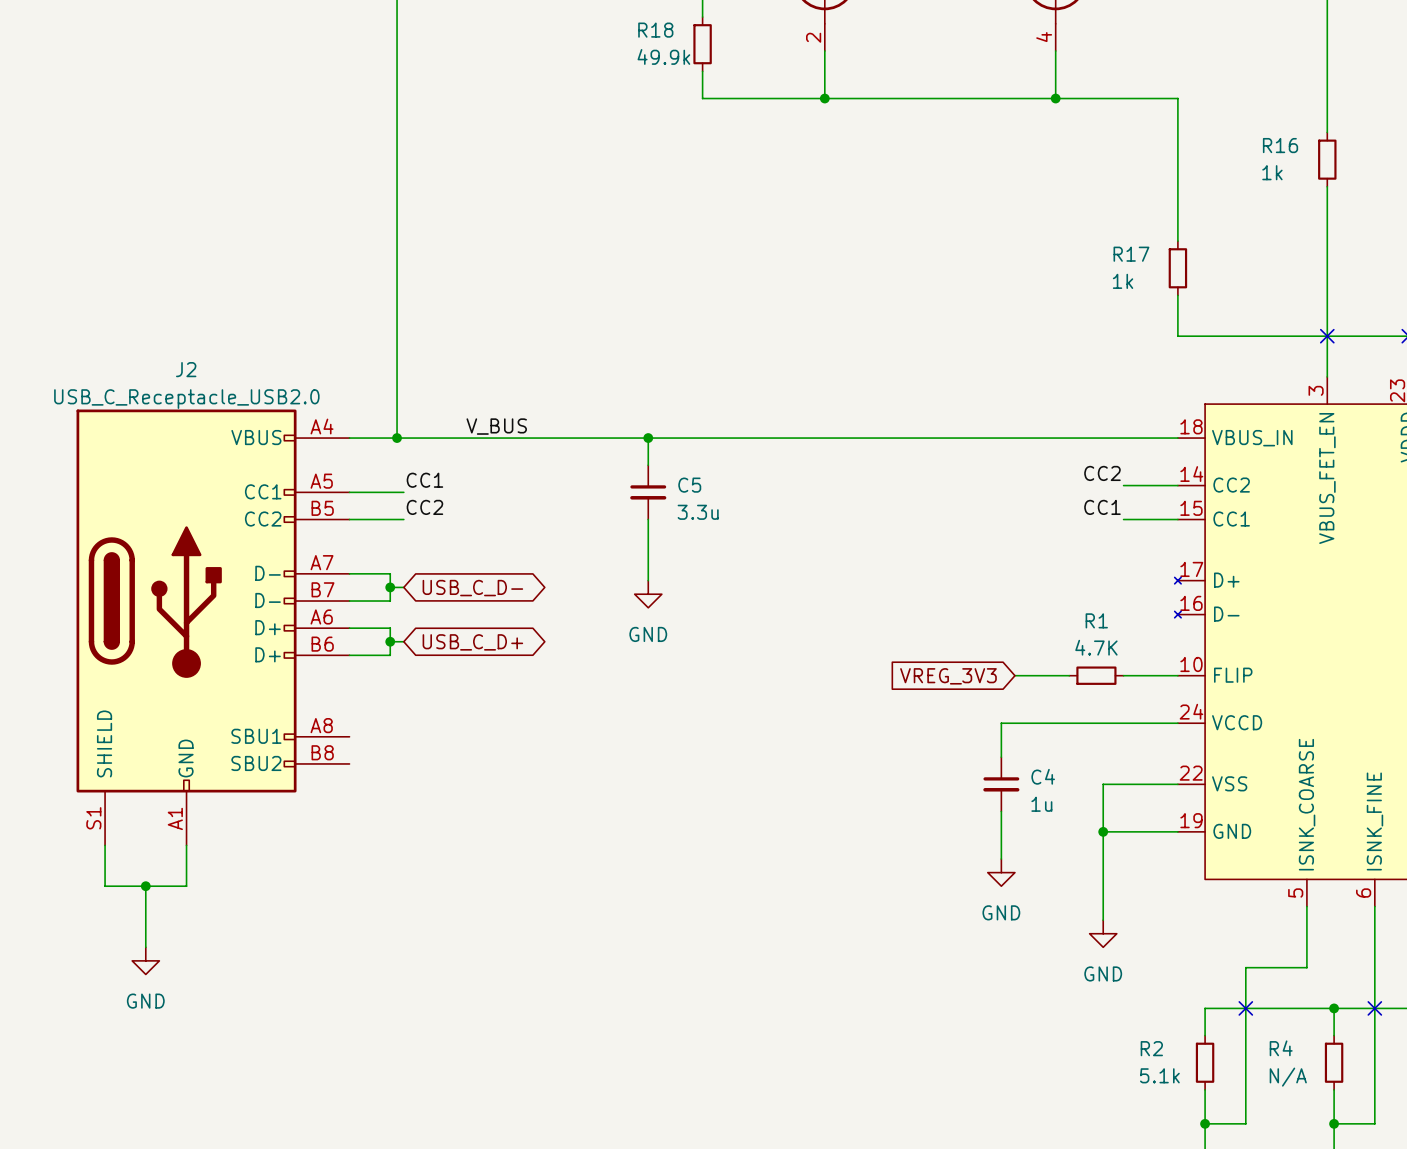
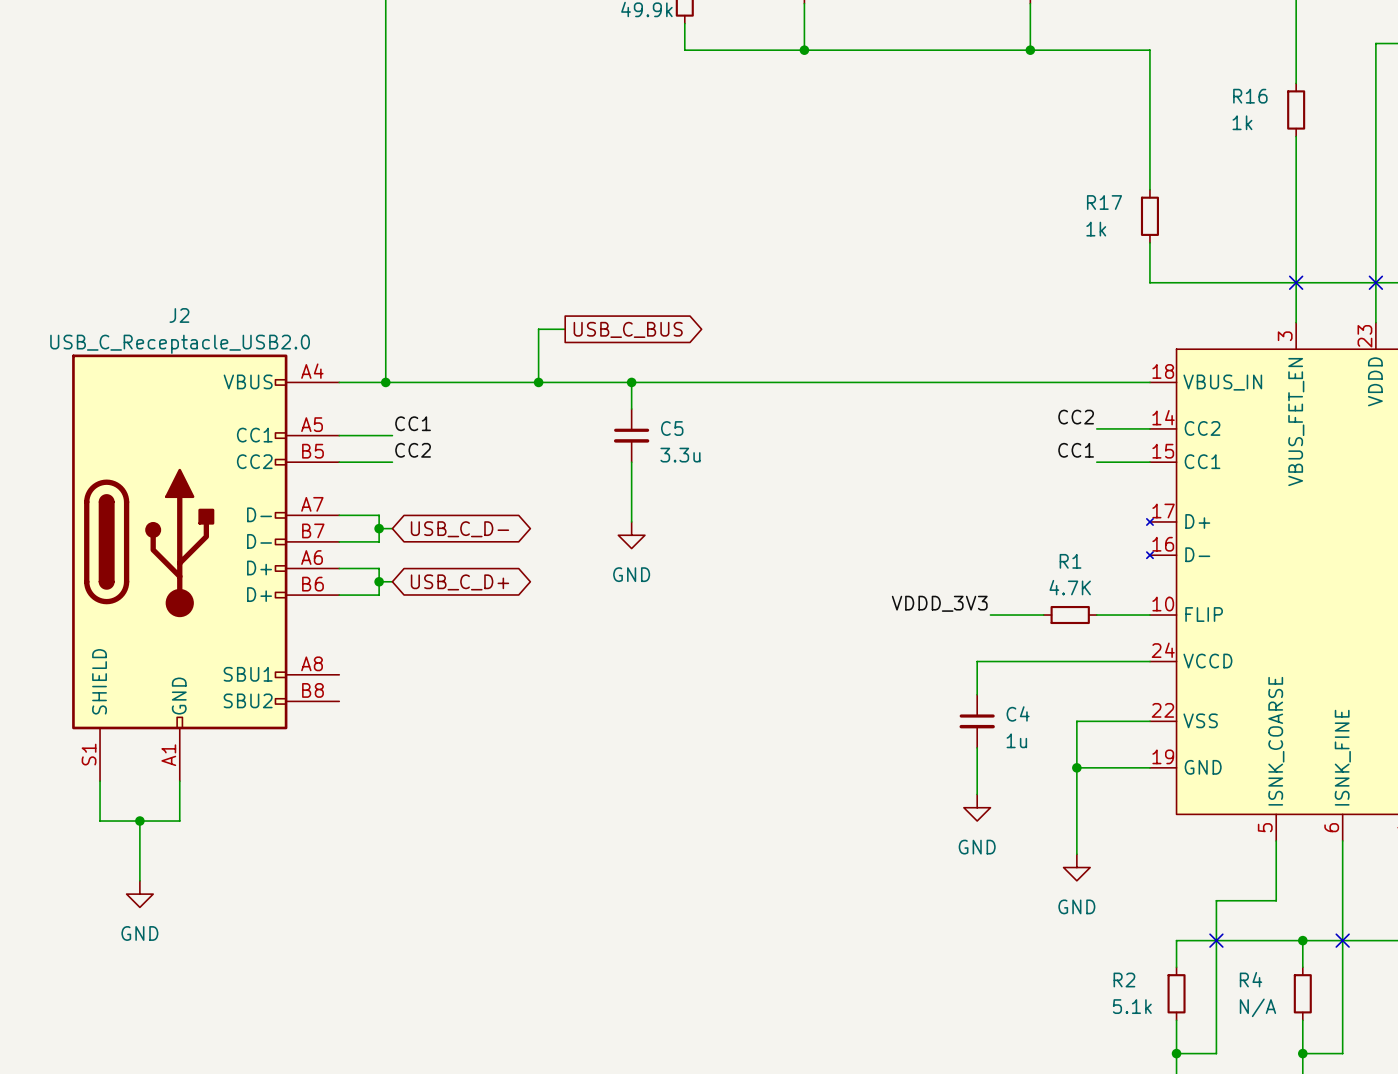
wire: none -> (565, 329) (538, 329) (538, 382)
global label: none -> USB_C_BUS (628, 329)
label: V_BUS (496, 426) -> none
junction: none -> (538, 382)
label: none -> VDDD_3V3 (939, 603)
global label: VREG_3V3 (948, 676) -> none

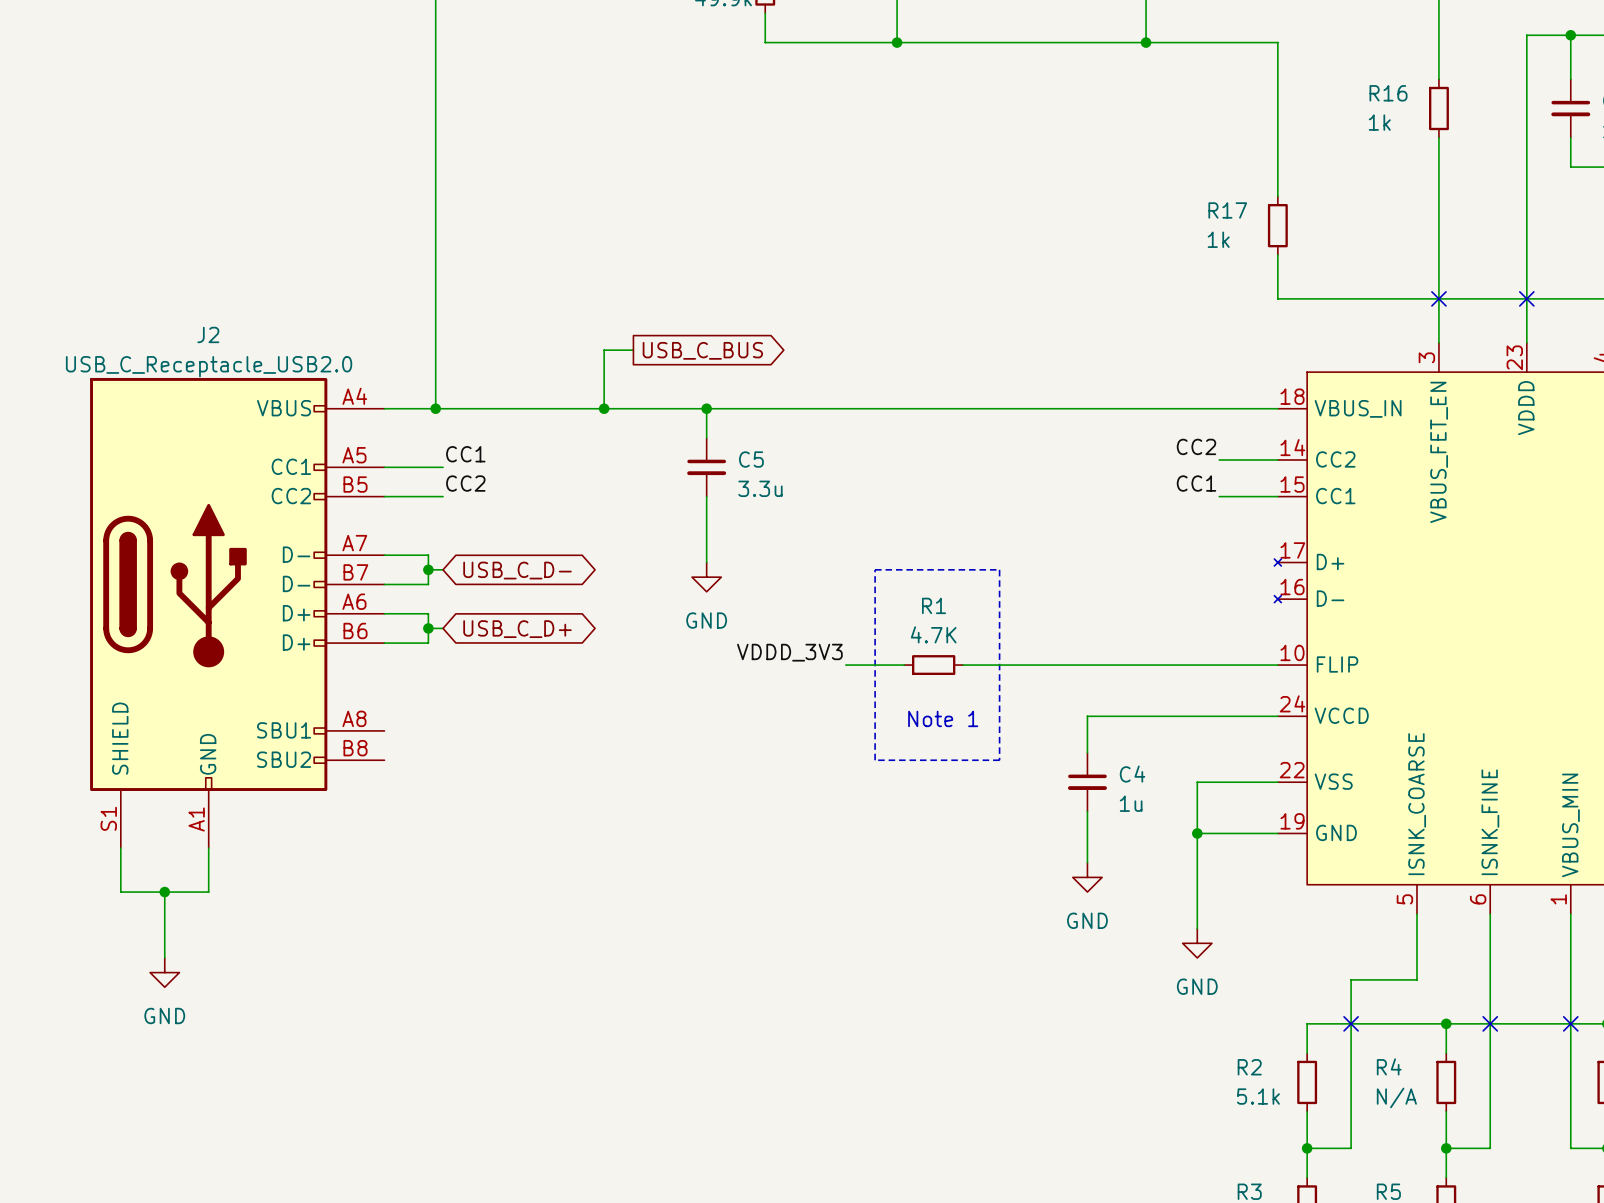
line: none -> (875, 569) (999, 569) (999, 760) (875, 760) (875, 569)
label position: VDDD_3V3 (939, 603) -> VDDD_3V3 (789, 652)
wire: none -> (845, 665) (904, 665)
wire: none -> (962, 665) (1102, 665)
wire: none -> (1160, 665) (1219, 665)
R1 position: (1070, 615) -> (933, 665)
text: none -> Note 1 (943, 718)

